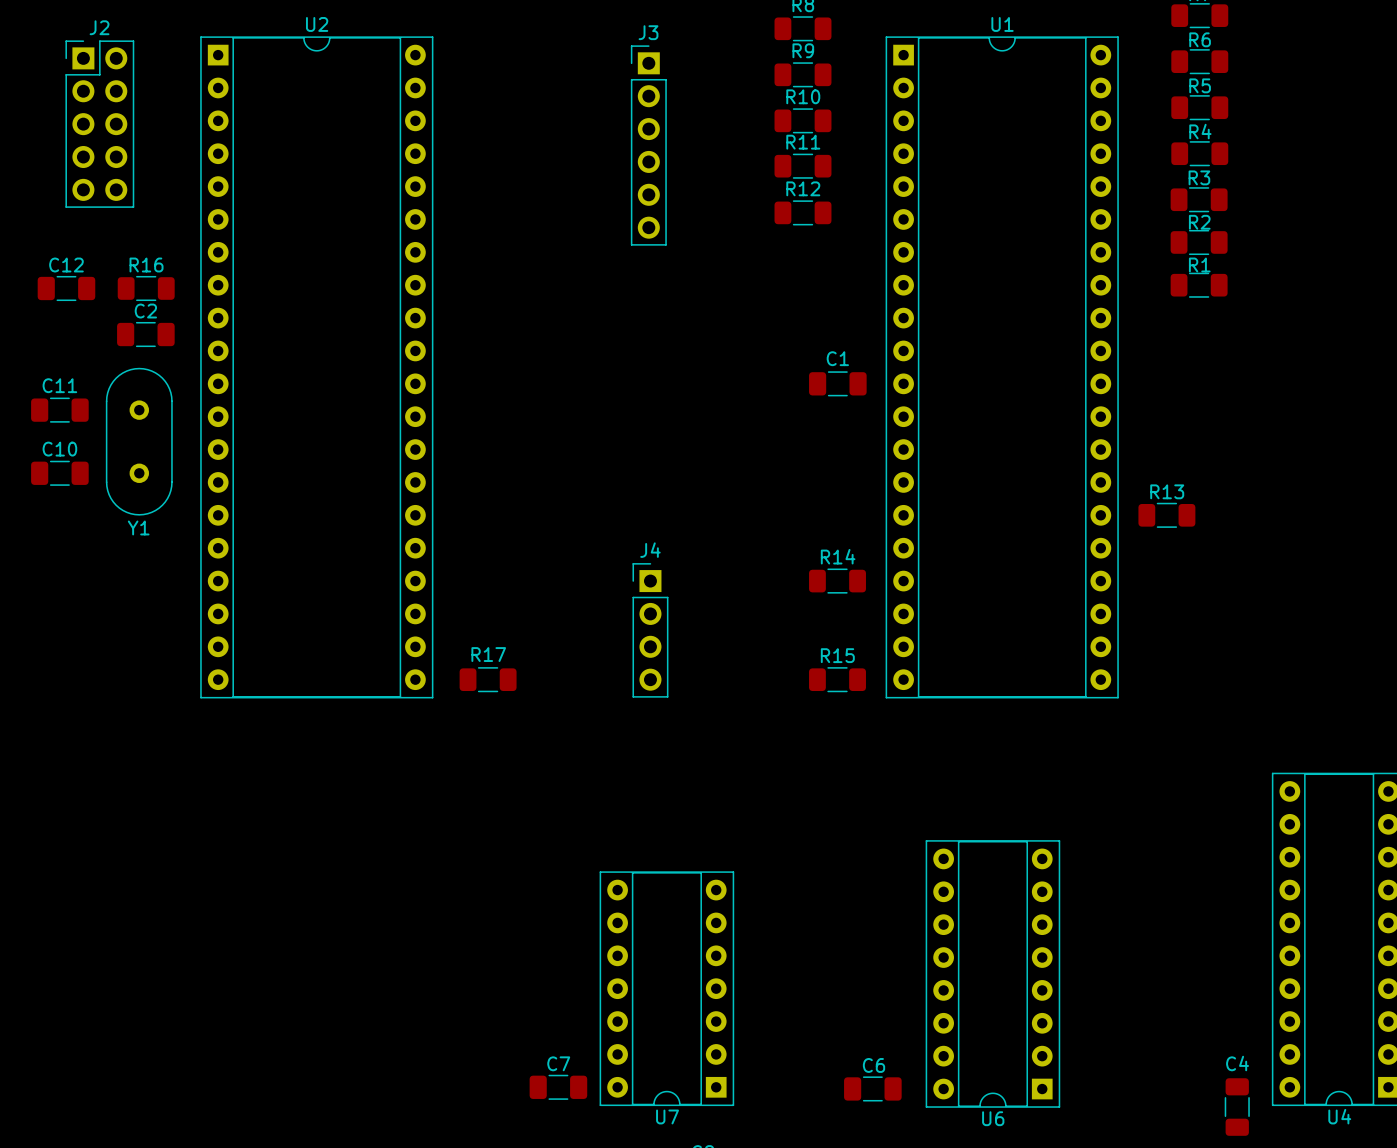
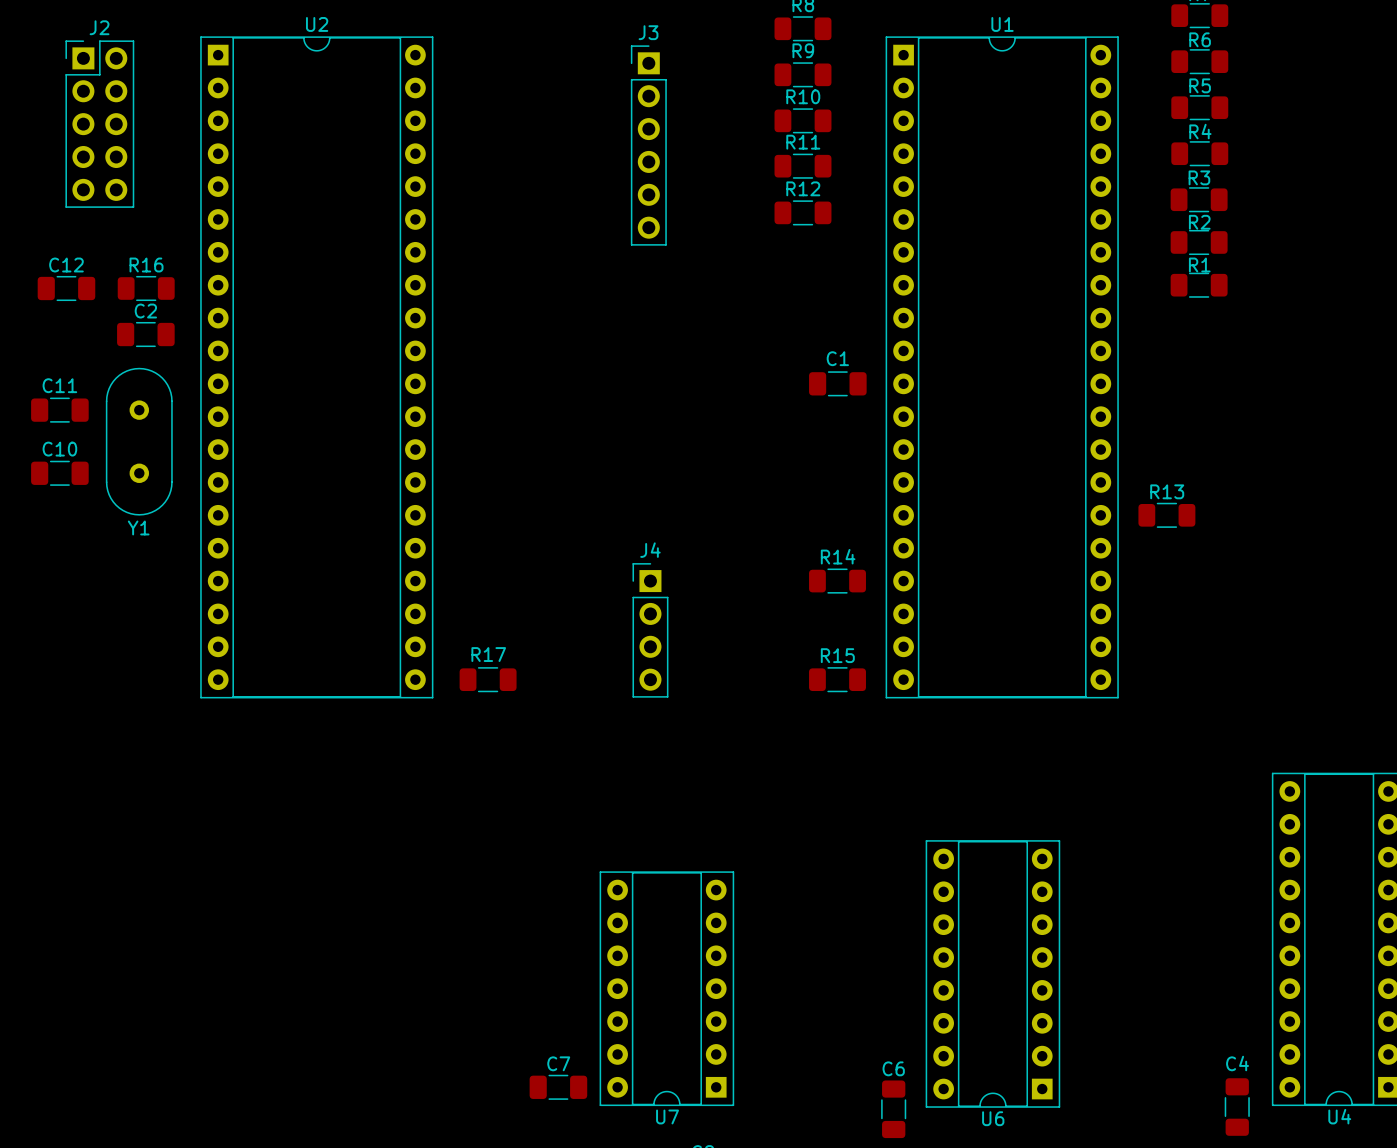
C6 rotation: 0° (872, 1088) -> 90° clockwise (893, 1109)

